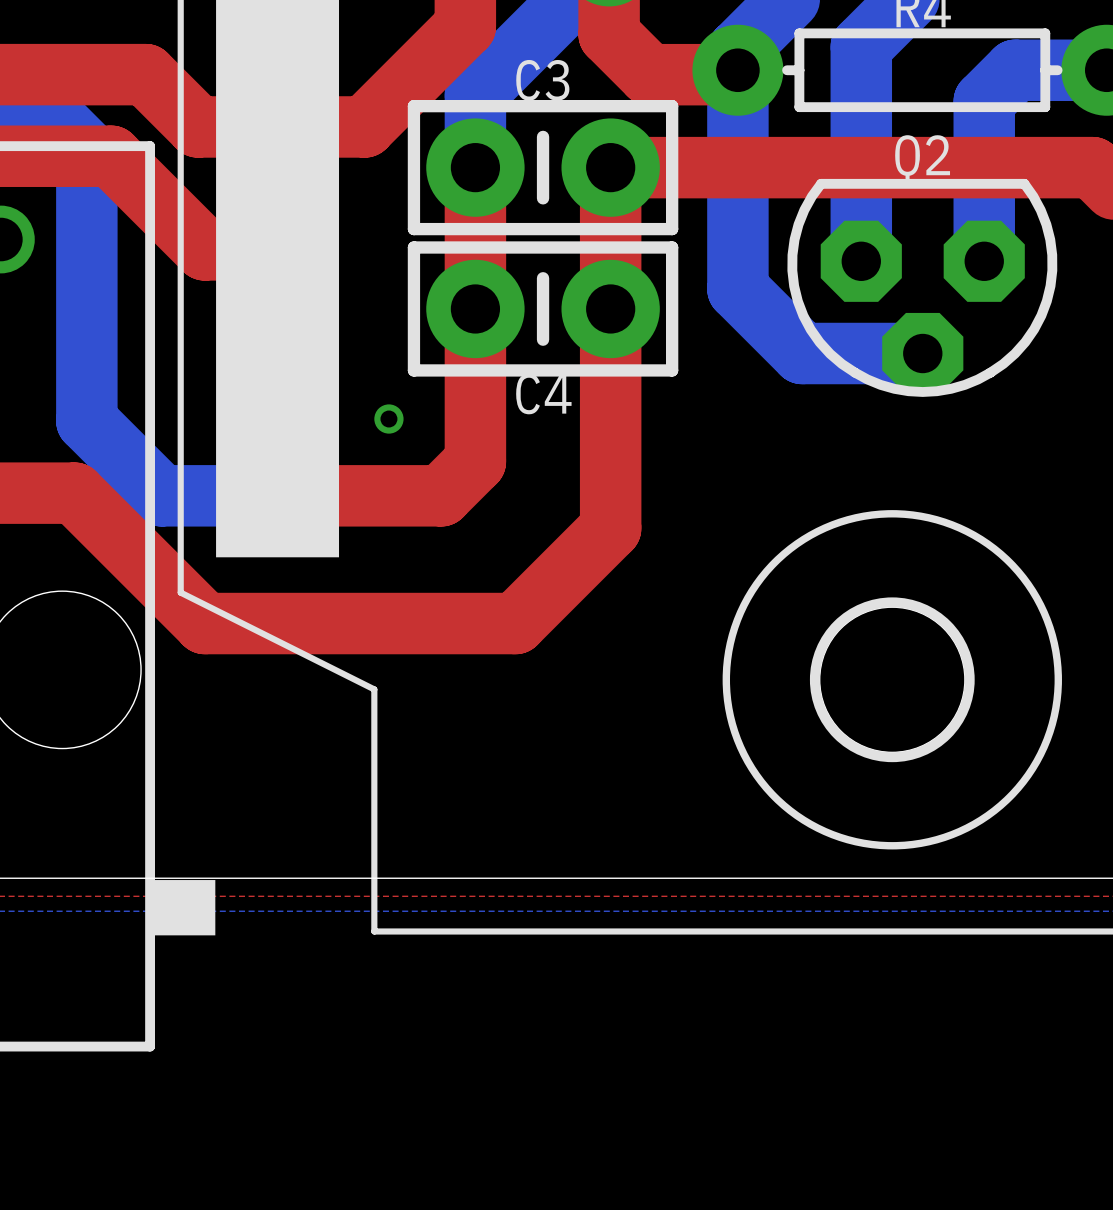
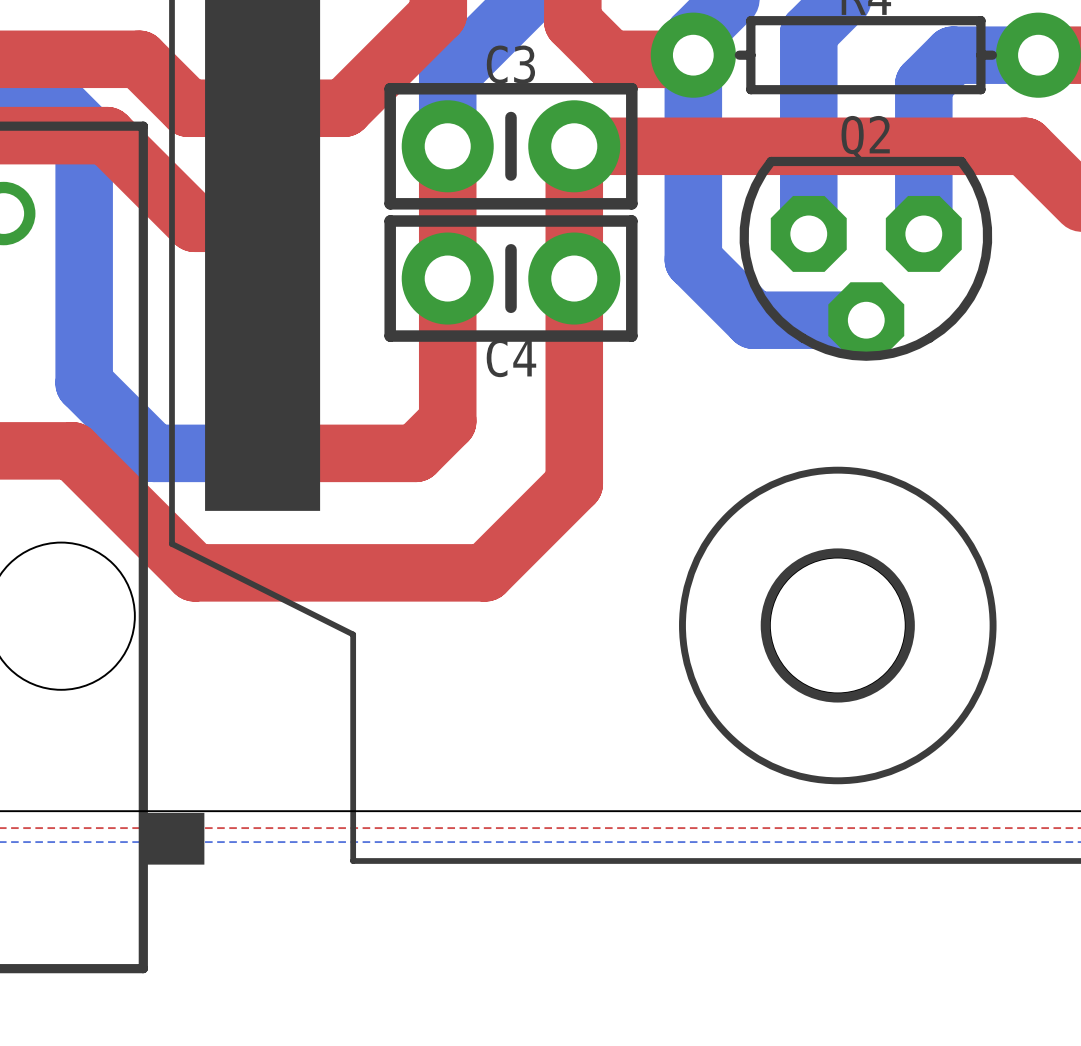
via: (388, 419) -> none

